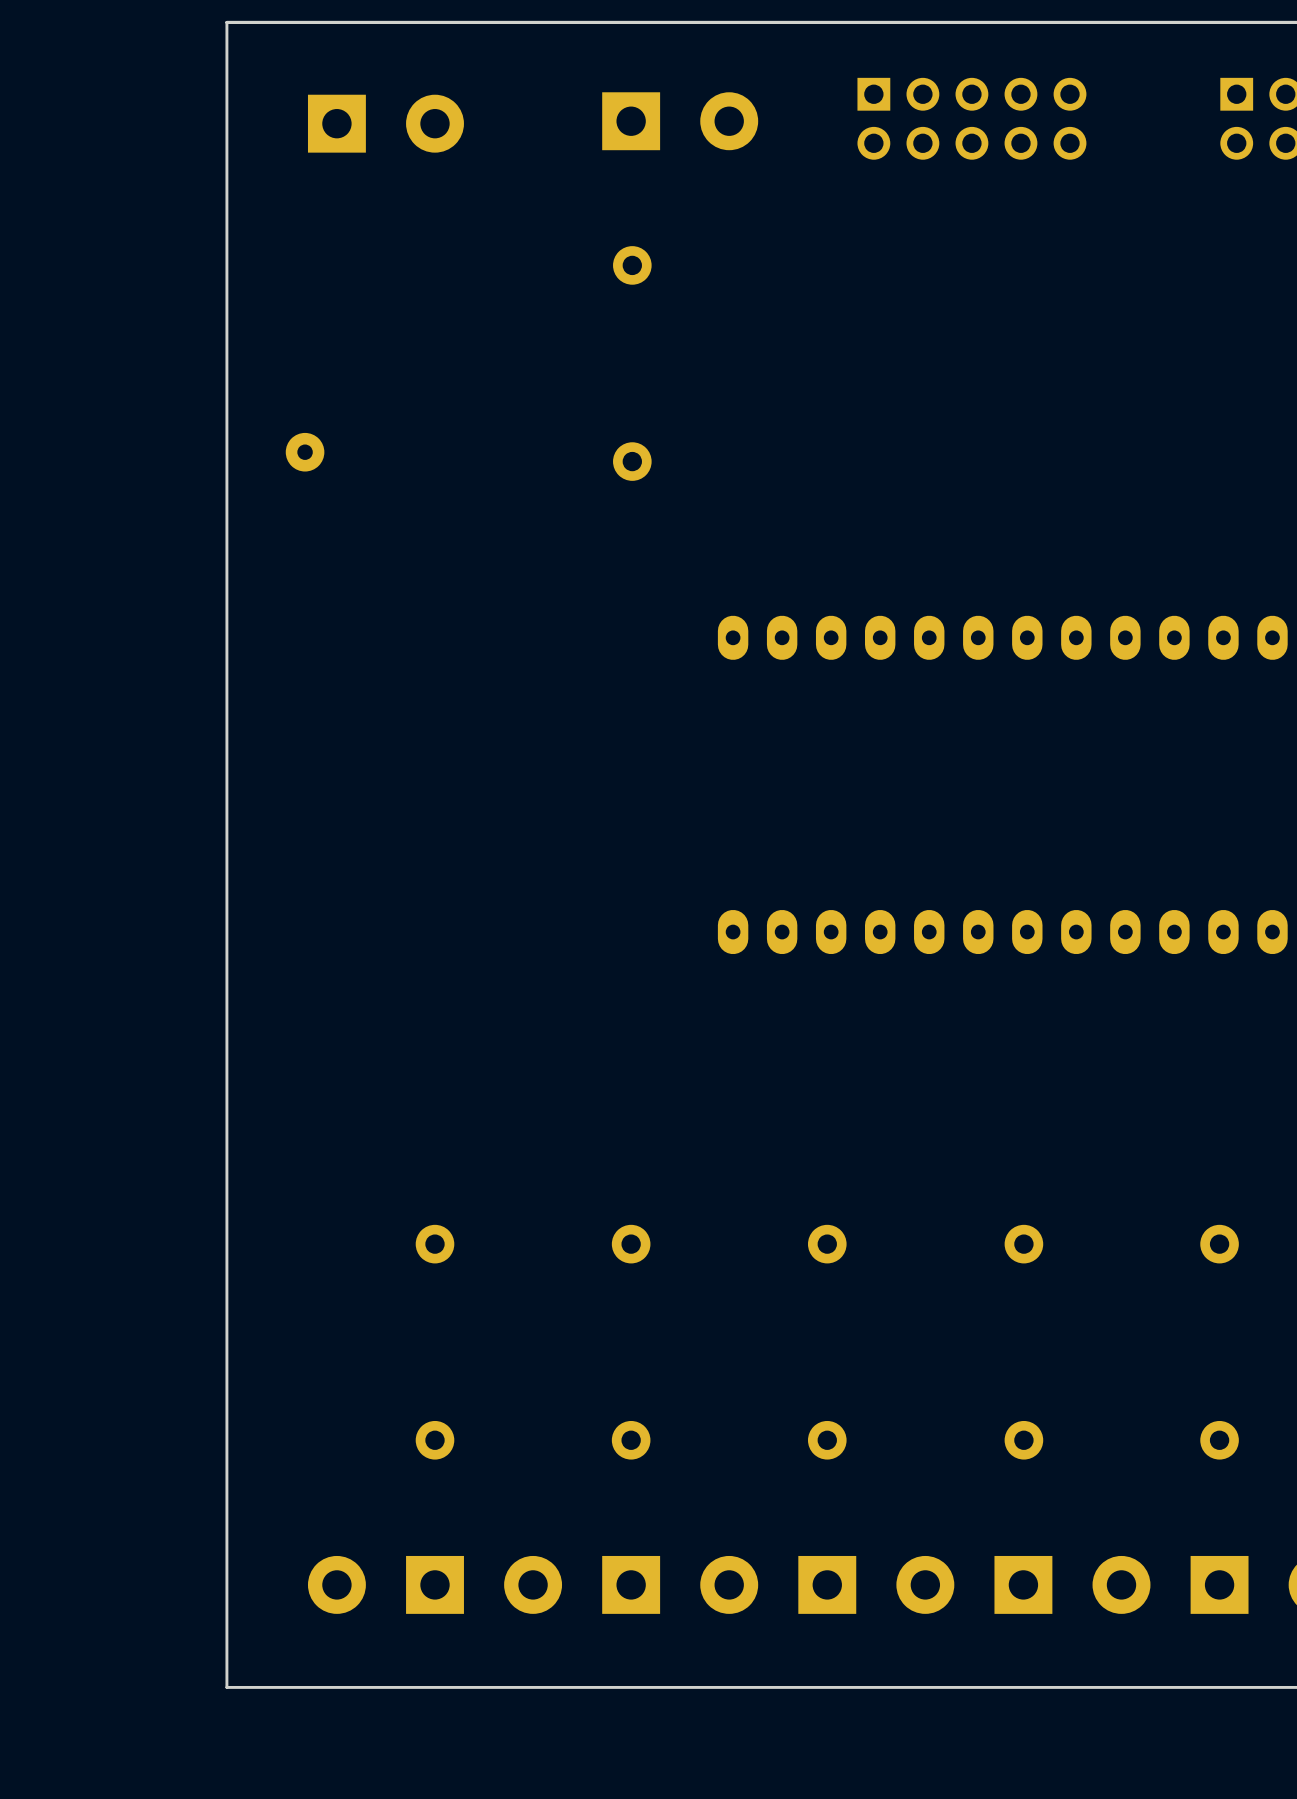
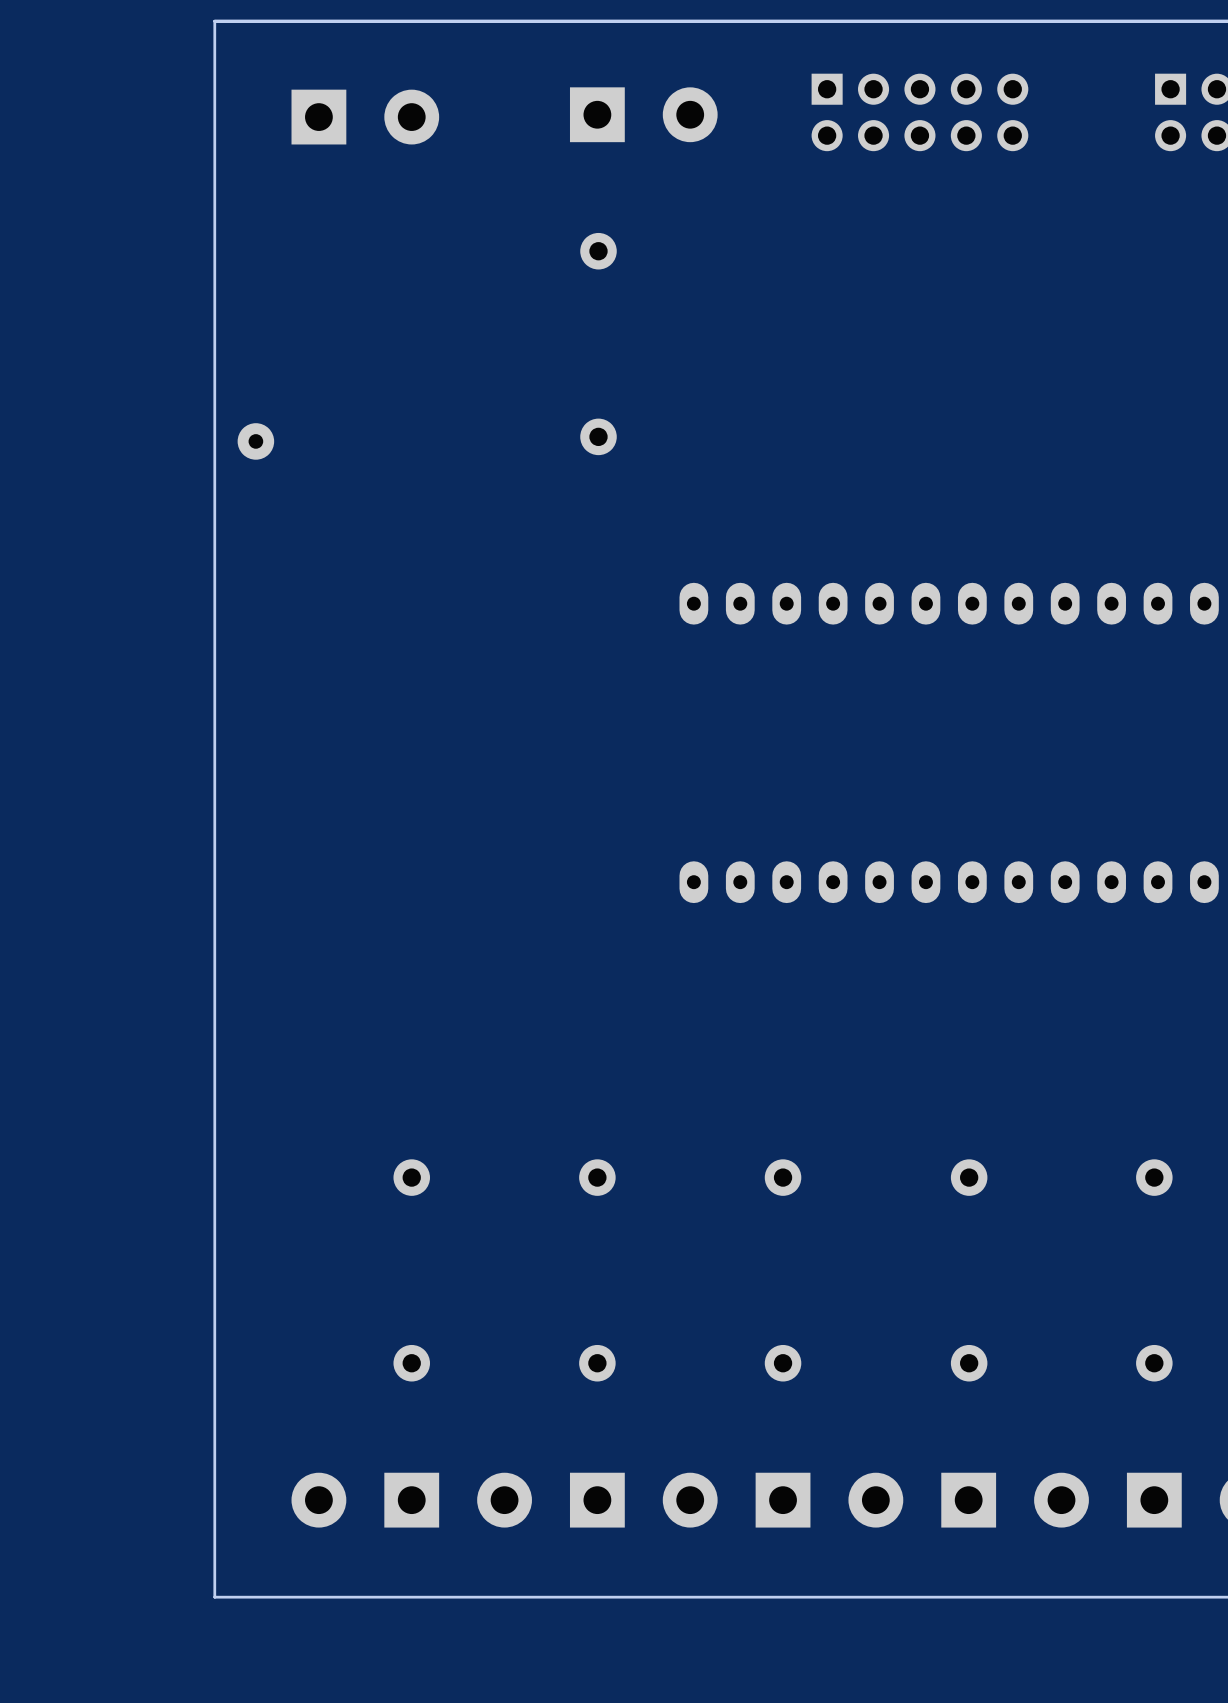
part position: (305, 452) -> (255, 441)

